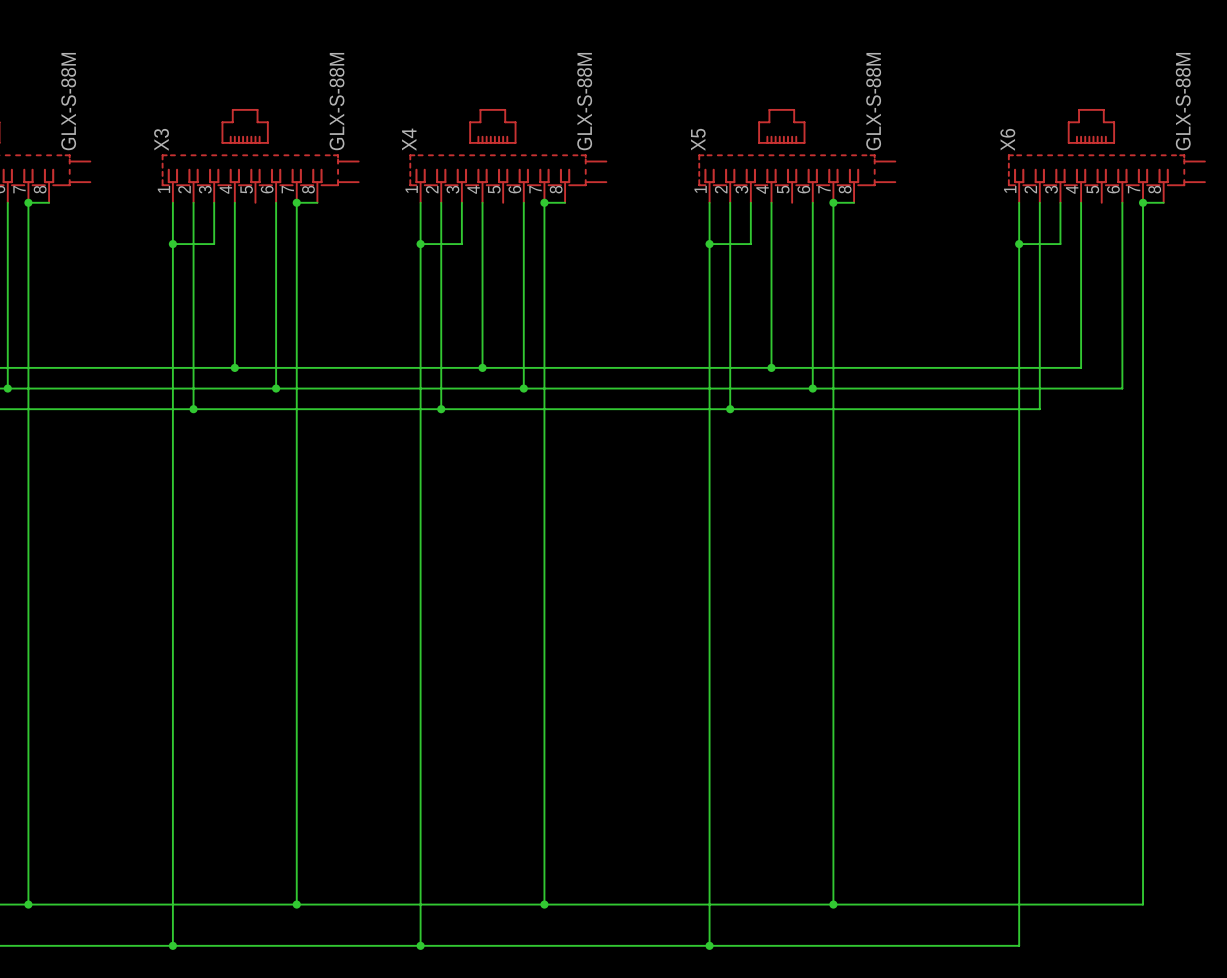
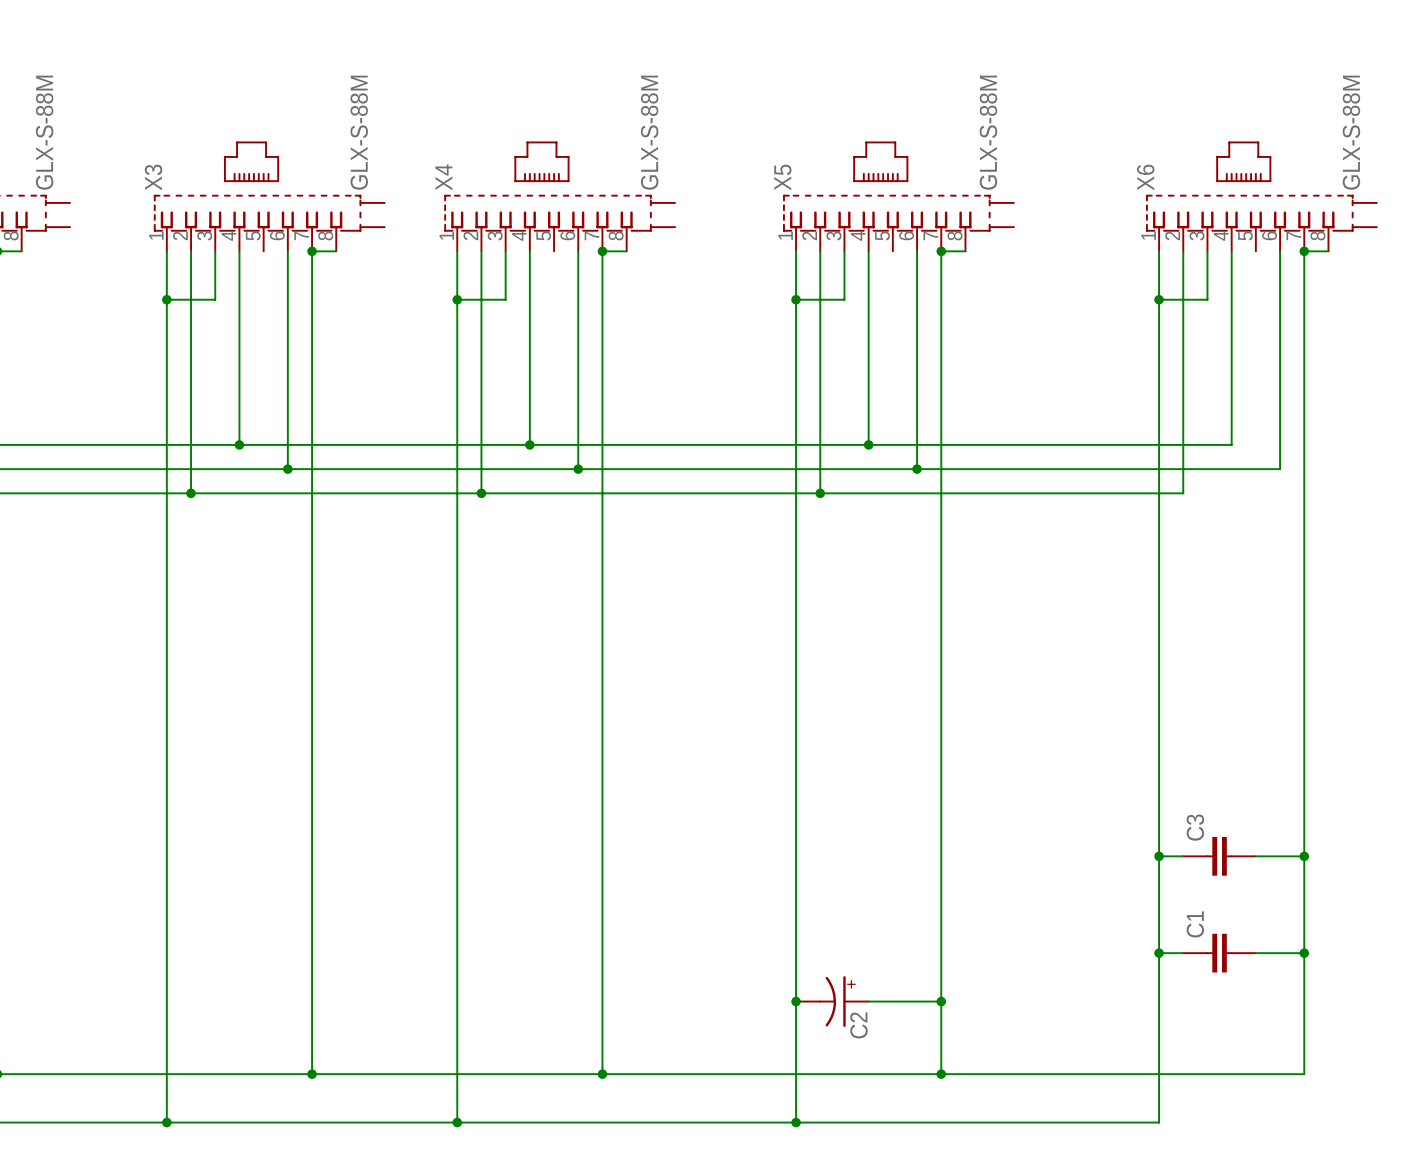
wire: none -> (1159, 856) (1183, 856)
junction: none -> (1159, 856)
C3: none -> (1219, 856)
wire: none -> (1255, 856) (1304, 856)
junction: none -> (1304, 856)
wire: none -> (1159, 953) (1183, 953)
junction: none -> (1159, 953)
C1: none -> (1219, 953)
wire: none -> (1255, 953) (1304, 953)
junction: none -> (1304, 953)
junction: none -> (796, 1001)
C2: none -> (832, 1001)
wire: none -> (868, 1001) (941, 1001)
junction: none -> (941, 1001)

